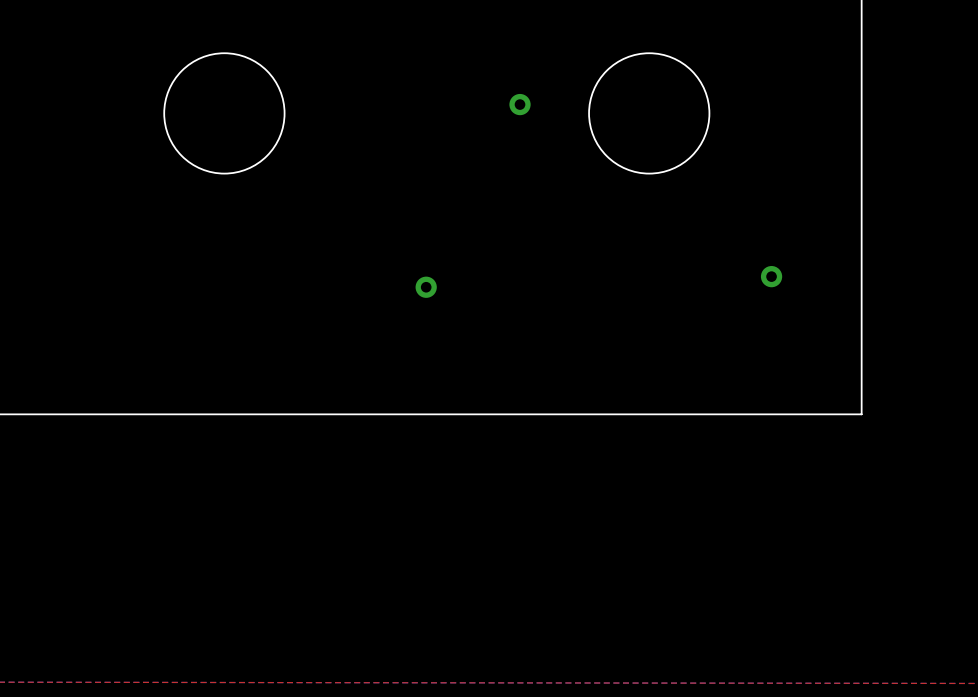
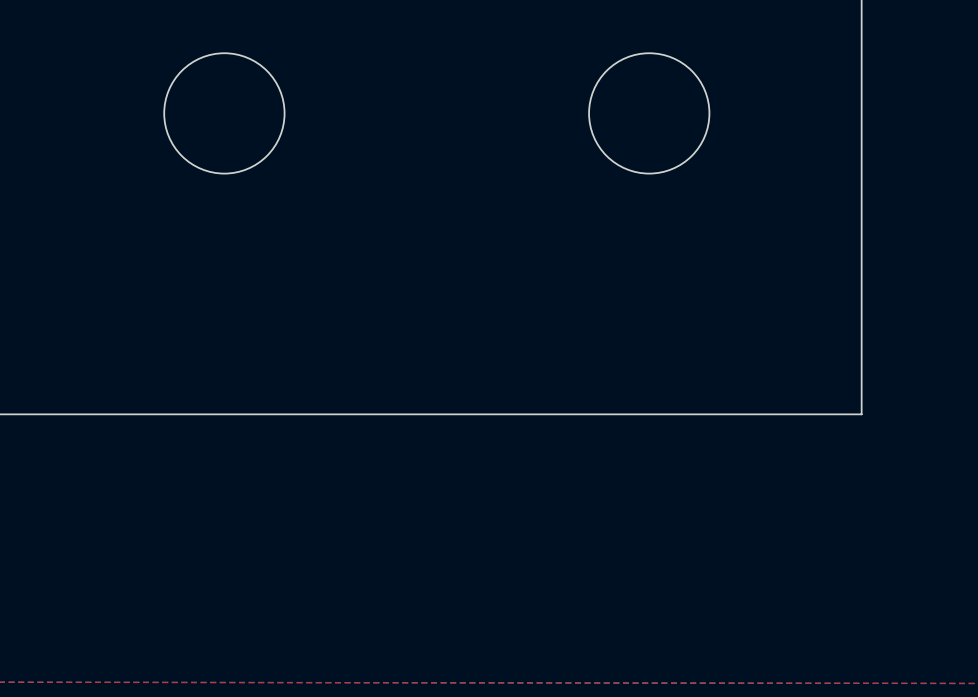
via: (520, 104) -> none
via: (771, 276) -> none
via: (426, 287) -> none

